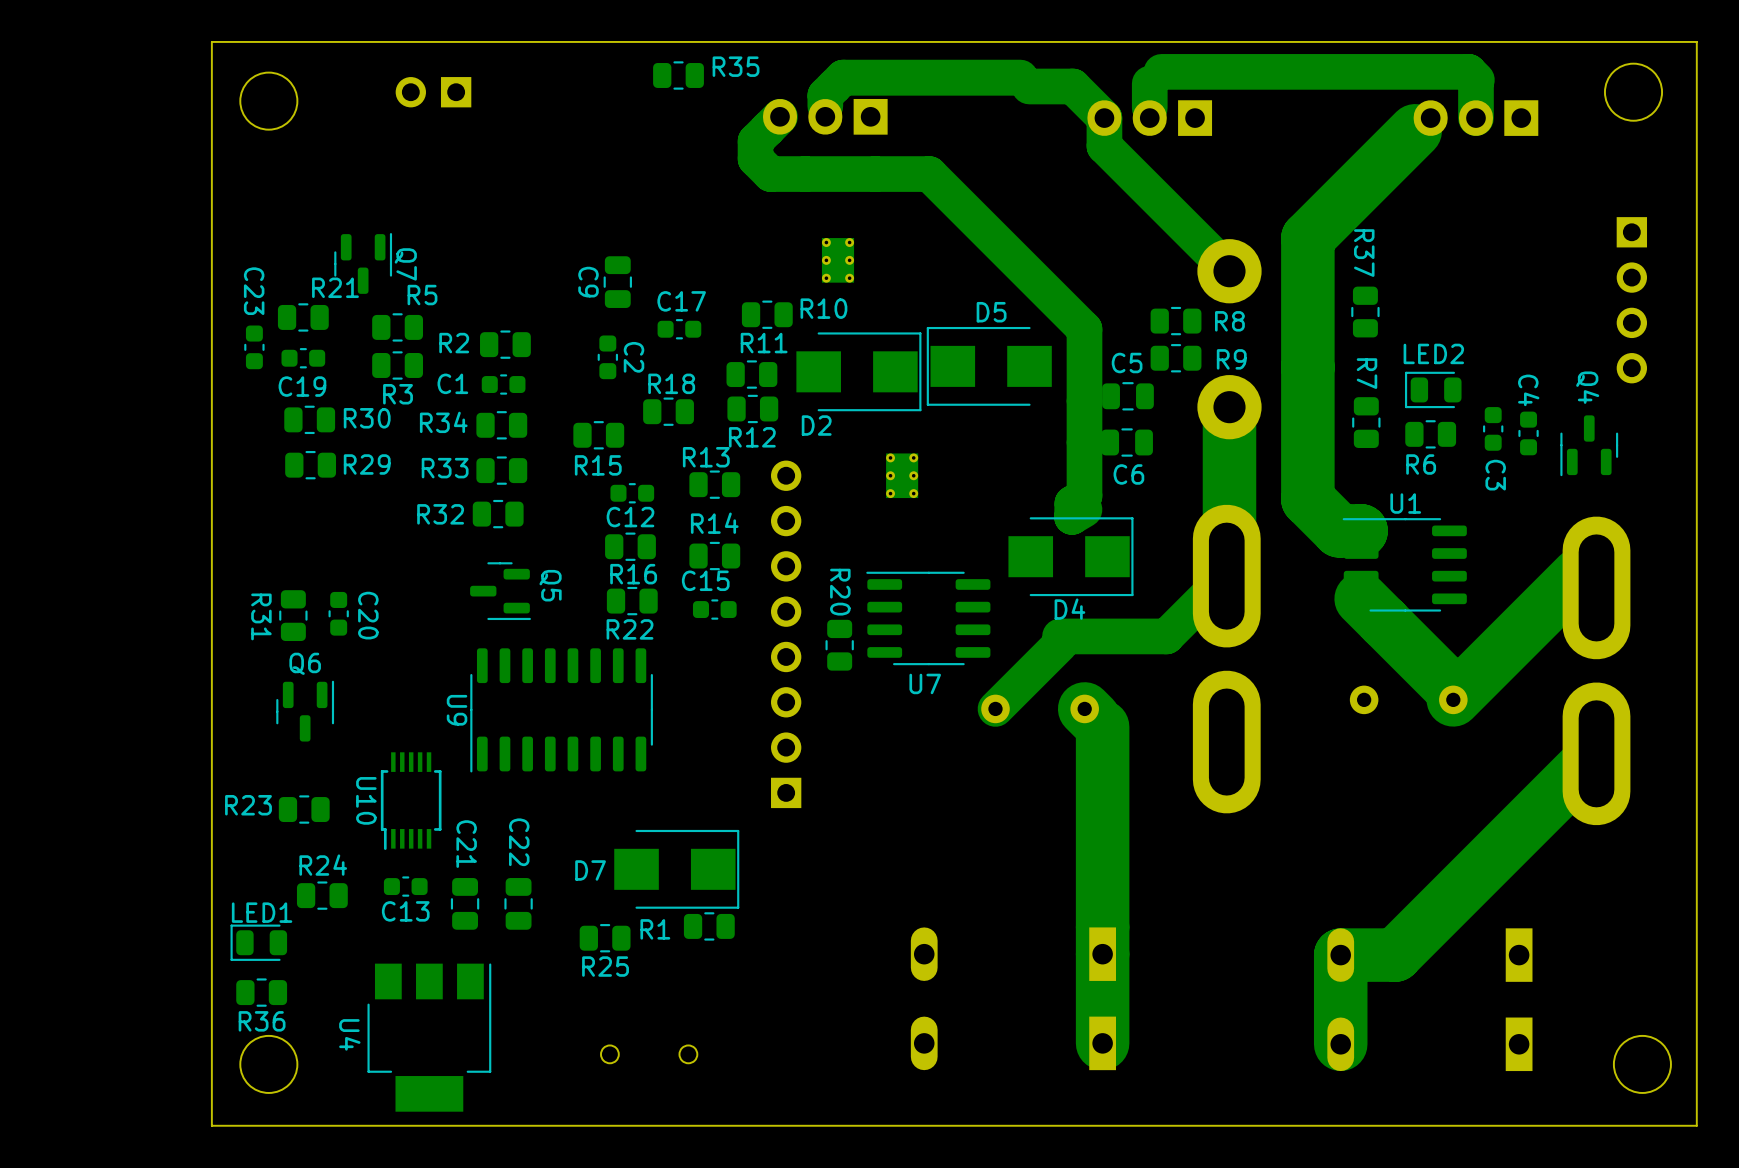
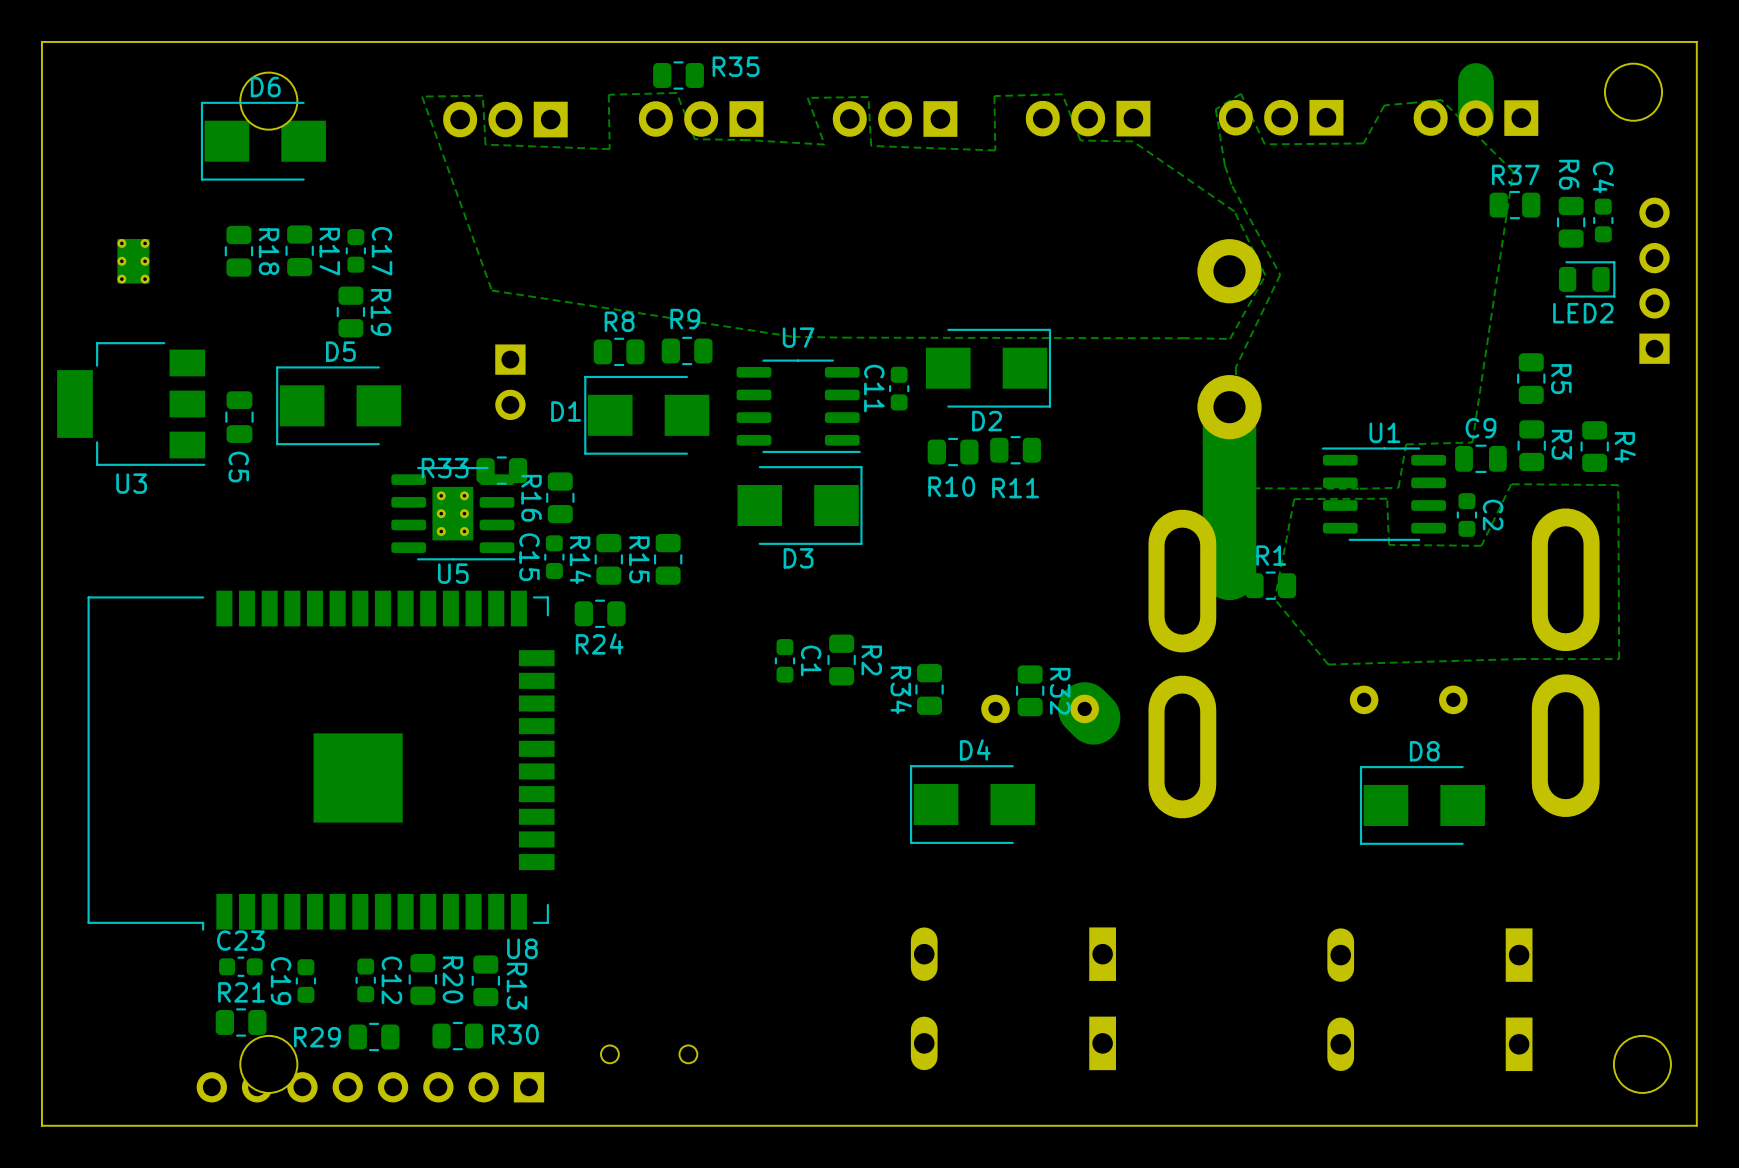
board edge: (211, 41) (211, 1125) -> (211, 41) (41, 41) (41, 1125) (211, 1125)
track: (1161, 71) (1468, 71) (1476, 80) -> none
track: (1020, 77) (843, 77) (825, 95) (825, 106) -> none
track: (1149, 83) (1149, 108) -> none
track: (834, 86) (1072, 86) (1104, 118) (1104, 146) (1229, 271) -> none
part rotation: 0° (433, 92) -> 90° counterclockwise (510, 382)
part position: (433, 92) -> (510, 382)
zone outline: none -> (676, 92) (694, 139) (824, 144) (807, 97) (868, 96) (871, 145) (995, 150) (994, 96) (1062, 94) (1080, 140) (1133, 141) (1234, 211) (1265, 275) (1230, 338) (792, 336) (491, 290) (422, 96) (482, 95) (485, 144) (609, 149) (608, 94) (676, 92)
zone outline: none -> (1240, 93) (1264, 144) (1363, 143) (1384, 105) (1441, 99) (1513, 171) (1472, 442) (1406, 444) (1398, 487) (1240, 488) (1235, 367) (1280, 274) (1232, 186) (1224, 165) (1215, 109) (1240, 93)
track: (780, 116) (755, 141) (755, 158) (770, 174) (929, 174) (1084, 329) (1084, 495) (1072, 503) (1072, 516) (1084, 509) -> none
part: (825, 116) -> none
part: none -> (1281, 117)
part: none -> (701, 118)
part: none -> (895, 118)
part position: (1149, 118) -> (1088, 118)
part: none -> (505, 119)
track: (1415, 130) (1307, 238) (1307, 499) (1339, 530) (1361, 530) -> none
D6: none -> (263, 141)
R17: none -> (299, 250)
part: (838, 260) -> none
part: none -> (133, 261)
Q7: (363, 263) -> none
C9 rotation: 0° (617, 282) -> 90° clockwise (1480, 458)
C9 position: (617, 282) -> (1480, 458)
R21 name position: R21 (335, 287) -> R21 (241, 992)
part rotation: 0° (1631, 300) -> 180° (1654, 280)
R10 name position: R10 (823, 308) -> R10 (951, 486)
R19: none -> (350, 311)
R37 rotation: 0° (1365, 312) -> 90° clockwise (1514, 205)
R37 position: (1365, 312) -> (1514, 205)
R10 position: (767, 314) -> (953, 452)
R21 position: (303, 317) -> (241, 1022)
R8 position: (1176, 321) -> (619, 351)
R8 name position: R8 (1229, 321) -> R8 (619, 321)
R5 rotation: 0° (397, 327) -> 90° clockwise (1531, 378)
R5 position: (397, 327) -> (1531, 378)
C17 rotation: 0° (679, 329) -> 90° clockwise (355, 250)
C17 position: (679, 329) -> (355, 250)
R2 name position: R2 (454, 343) -> R2 (871, 660)
R11 name position: R11 (764, 343) -> R11 (1015, 488)
R2 rotation: 0° (505, 344) -> 90° clockwise (841, 660)
R2 position: (505, 344) -> (841, 660)
C23 rotation: 0° (254, 347) -> 90° clockwise (240, 966)
C23 position: (254, 347) -> (240, 966)
C2 position: (607, 357) -> (1466, 515)
C19 rotation: 0° (303, 358) -> 90° clockwise (305, 981)
C19 position: (303, 358) -> (305, 981)
R9 position: (1176, 358) -> (687, 350)
R9 name position: R9 (1231, 359) -> R9 (685, 319)
C5 name position: C5 (1127, 363) -> C5 (238, 466)
R3 rotation: 0° (397, 365) -> 90° clockwise (1531, 445)
R3 position: (397, 365) -> (1531, 445)
D5 position: (989, 366) -> (338, 405)
D2 position: (858, 371) -> (988, 368)
R11 position: (751, 374) -> (1015, 450)
C1 name position: C1 (452, 383) -> C1 (811, 660)
C1 rotation: 0° (503, 384) -> 90° clockwise (784, 660)
C1 position: (503, 384) -> (784, 660)
C11: none -> (899, 388)
LED2 rotation: 0° (1433, 389) -> 180° (1587, 279)
LED2 position: (1433, 389) -> (1587, 279)
R3 name position: R3 (398, 394) -> R3 (1561, 444)
C5 rotation: 0° (1128, 396) -> 90° clockwise (239, 417)
C5 position: (1128, 396) -> (239, 417)
U3: none -> (131, 403)
R12: (752, 408) -> none
R18 rotation: 0° (668, 411) -> 90° clockwise (238, 251)
R18 position: (668, 411) -> (238, 251)
D1: none -> (646, 415)
R30 position: (309, 419) -> (457, 1036)
R7: (1366, 422) -> none
R34 rotation: 0° (501, 425) -> 90° clockwise (929, 689)
R34 position: (501, 425) -> (929, 689)
D2 name position: D2 (816, 425) -> D2 (987, 421)
C3: (1493, 428) -> none
C4 position: (1528, 433) -> (1603, 220)
R6 rotation: 0° (1430, 434) -> 90° clockwise (1571, 222)
R6 position: (1430, 434) -> (1571, 222)
R15 rotation: 0° (598, 435) -> 90° clockwise (668, 559)
R15 position: (598, 435) -> (668, 559)
C6: (1127, 442) -> none
Q4: (1589, 445) -> none
R4: none -> (1594, 446)
R29 name position: R29 (367, 464) -> R29 (317, 1037)
R6 name position: R6 (1421, 464) -> R6 (1569, 174)
R29 position: (310, 465) -> (374, 1036)
part: (902, 475) -> none
R13 rotation: 0° (714, 484) -> 90° clockwise (485, 980)
R13 position: (714, 484) -> (485, 980)
zone outline: none -> (1511, 484) (1618, 485) (1619, 659) (1518, 659) (1328, 664) (1274, 599) (1294, 499) (1387, 498) (1388, 544) (1481, 545) (1511, 484)
C12 rotation: 0° (632, 493) -> 90° clockwise (365, 980)
C12 position: (632, 493) -> (365, 980)
D3: none -> (800, 505)
U5: none -> (453, 513)
R32 name position: R32 (440, 514) -> R32 (1060, 691)
R32 rotation: 0° (498, 514) -> 90° clockwise (1030, 690)
R32 position: (498, 514) -> (1030, 690)
C12 name position: C12 (630, 517) -> C12 (391, 980)
R14 name position: R14 (714, 523) -> R14 (580, 560)
R16 rotation: 0° (630, 546) -> 90° clockwise (560, 497)
R16 position: (630, 546) -> (560, 497)
R14 rotation: 0° (714, 556) -> 90° clockwise (608, 559)
R14 position: (714, 556) -> (608, 559)
D4 rotation: 0° (1070, 556) -> 180° (972, 804)
D4 position: (1070, 556) -> (972, 804)
U1 position: (1404, 564) -> (1383, 494)
track: (1578, 574) (1453, 699) -> none
track: (1226, 576) (1166, 636) (1060, 636) -> none
Q5: (500, 591) -> none
R20 name position: R20 (840, 592) -> R20 (452, 979)
track: (1361, 598) (1453, 691) -> none
R22: (632, 601) -> none
C15 rotation: 0° (714, 609) -> 90° clockwise (554, 557)
C15 position: (714, 609) -> (554, 557)
C20: (338, 613) -> none
R31: (293, 615) -> none
U7 rotation: 0° (928, 618) -> 180° (798, 406)
U7 position: (928, 618) -> (798, 406)
part: (786, 634) -> none
track: (1060, 644) (995, 708) -> none
R20 position: (839, 645) -> (422, 979)
part position: (1226, 659) -> (1182, 664)
part position: (1596, 670) -> (1565, 662)
U9: (561, 710) -> none
Q6: (305, 711) -> none
track: (1102, 726) (1102, 1043) -> none
track: (1596, 753) (1395, 955) (1340, 955) (1340, 1044) -> none
U8: none -> (321, 760)
U10: (411, 801) -> none
D8: none -> (1422, 805)
R23: (304, 809) -> none
R24 name position: R24 (323, 865) -> R24 (599, 643)
D7: (676, 869) -> none
C13: (405, 886) -> none
R24 position: (322, 895) -> (600, 613)
C21: (465, 903) -> none
C22: (518, 903) -> none
R1 position: (709, 926) -> (1270, 585)
R1 name position: R1 (655, 929) -> R1 (1271, 555)
R25: (605, 938) -> none
LED1: (258, 942) -> none
R36: (261, 992) -> none
U4: (429, 1037) -> none
part: none -> (370, 1087)

